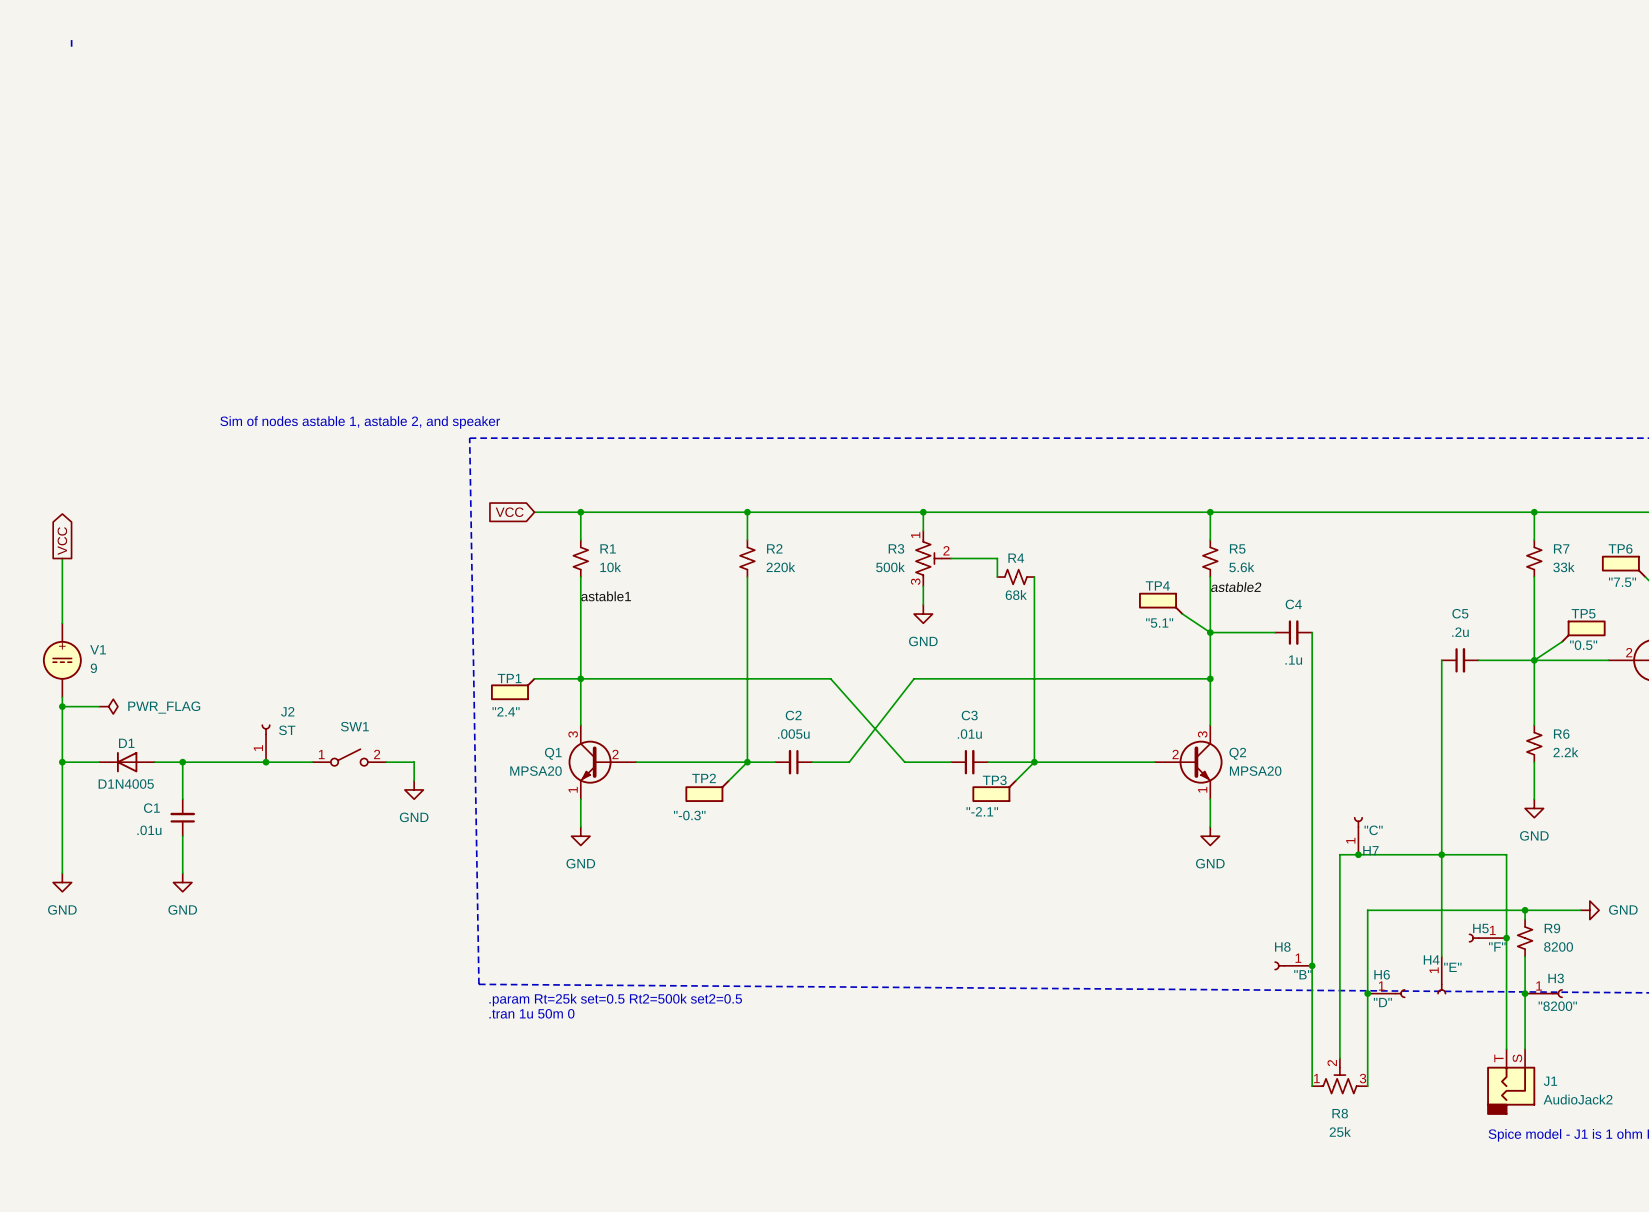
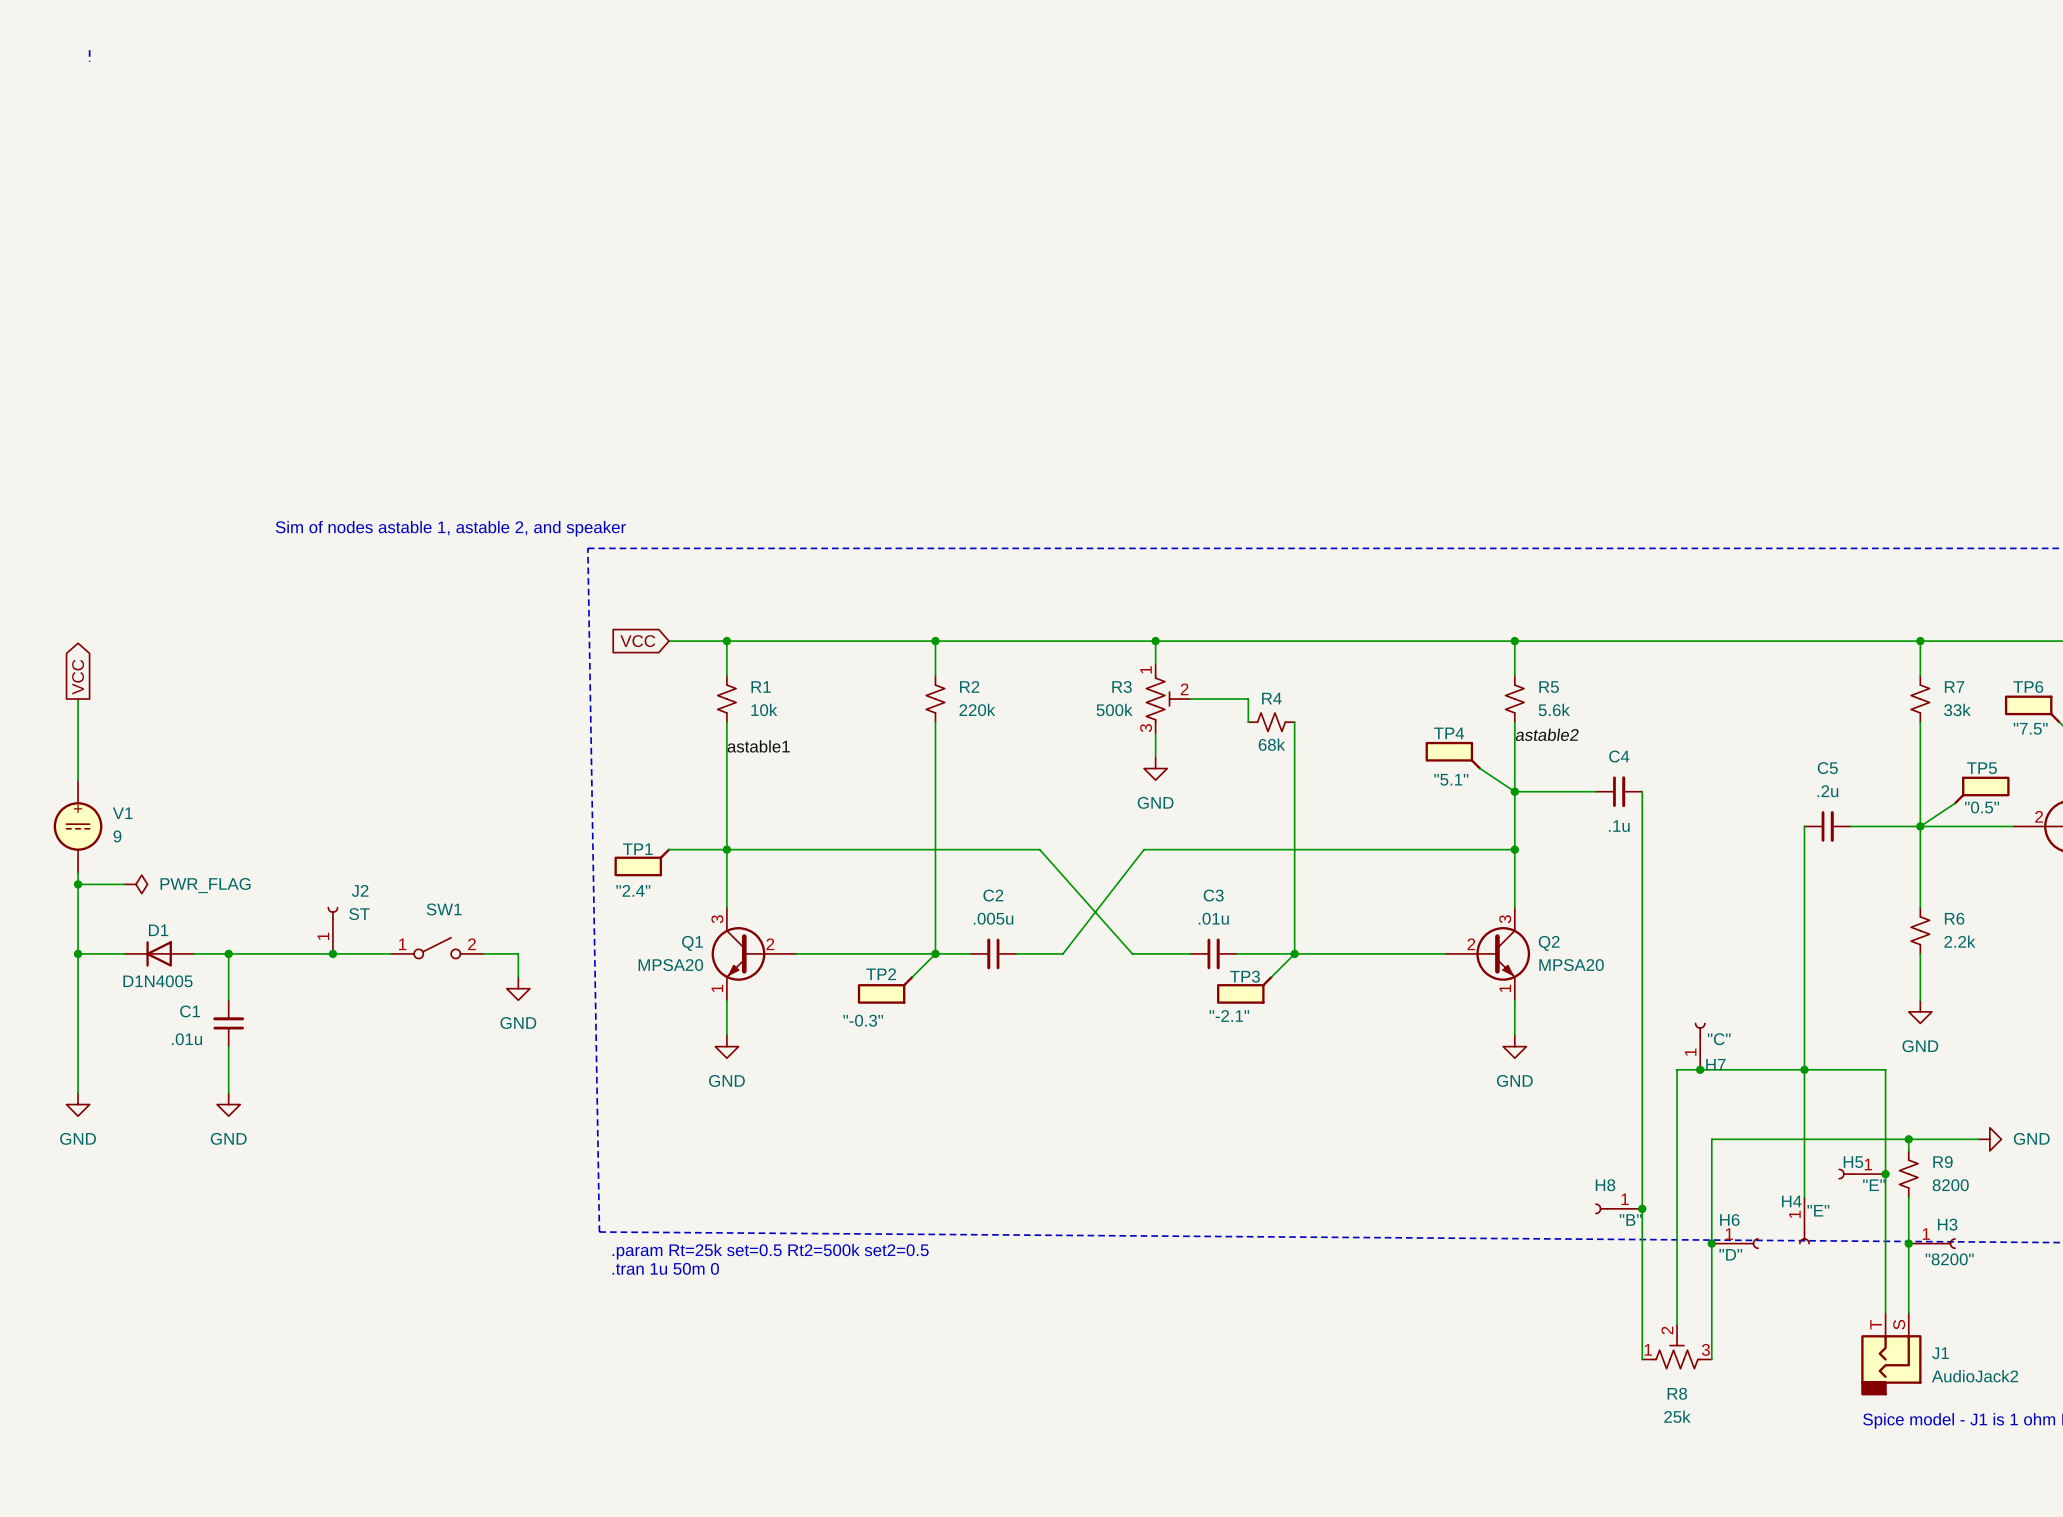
H5 value: "F" (1497, 946) -> "E" (1873, 1185)

